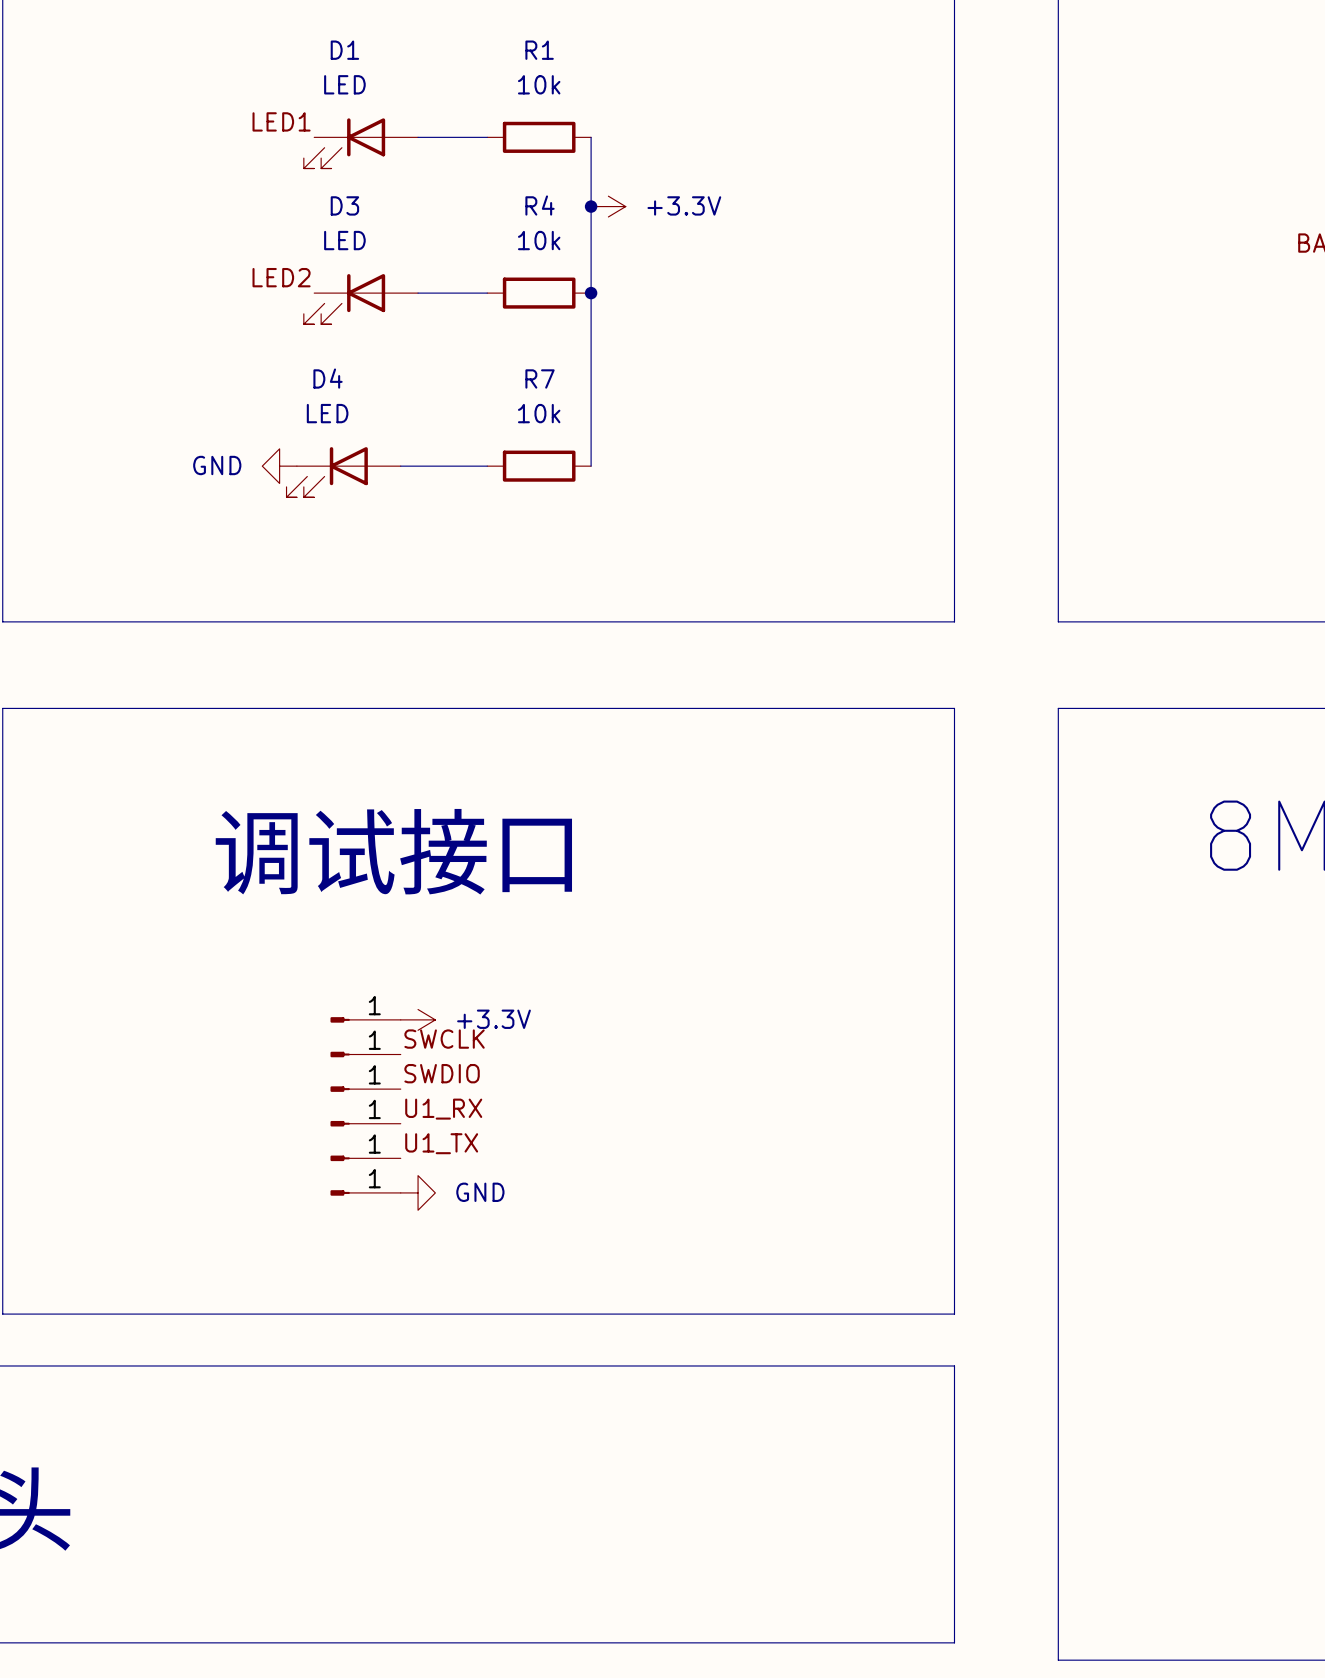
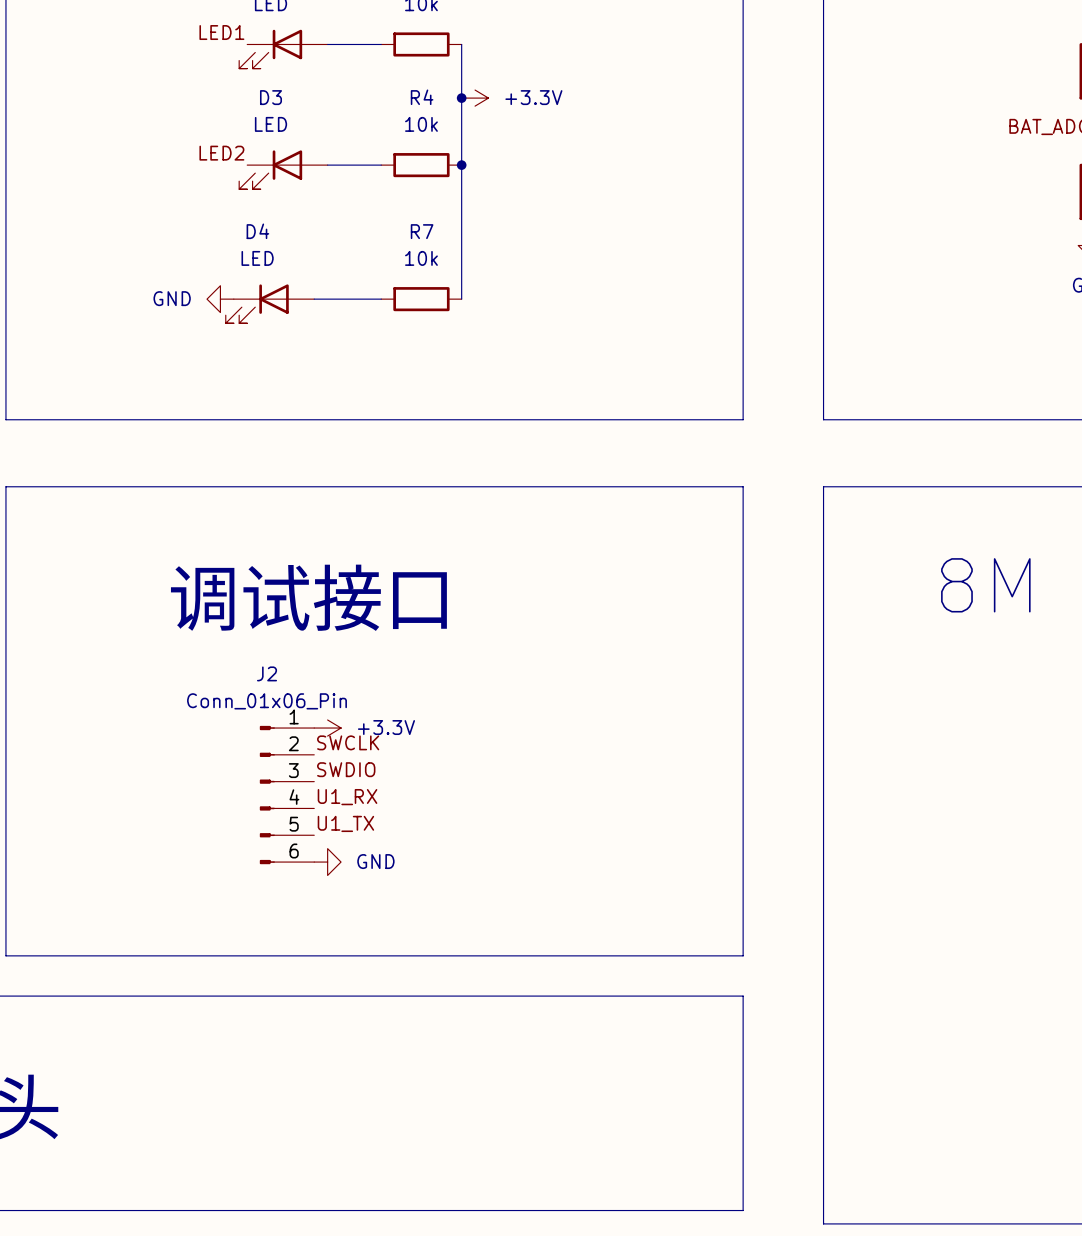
part: (365, 1054) -> none
part: (365, 1089) -> none
J2: none -> Conn_01x06_Pin (287, 795)
part: (365, 1123) -> none
part: (365, 1158) -> none
part: (365, 1192) -> none

